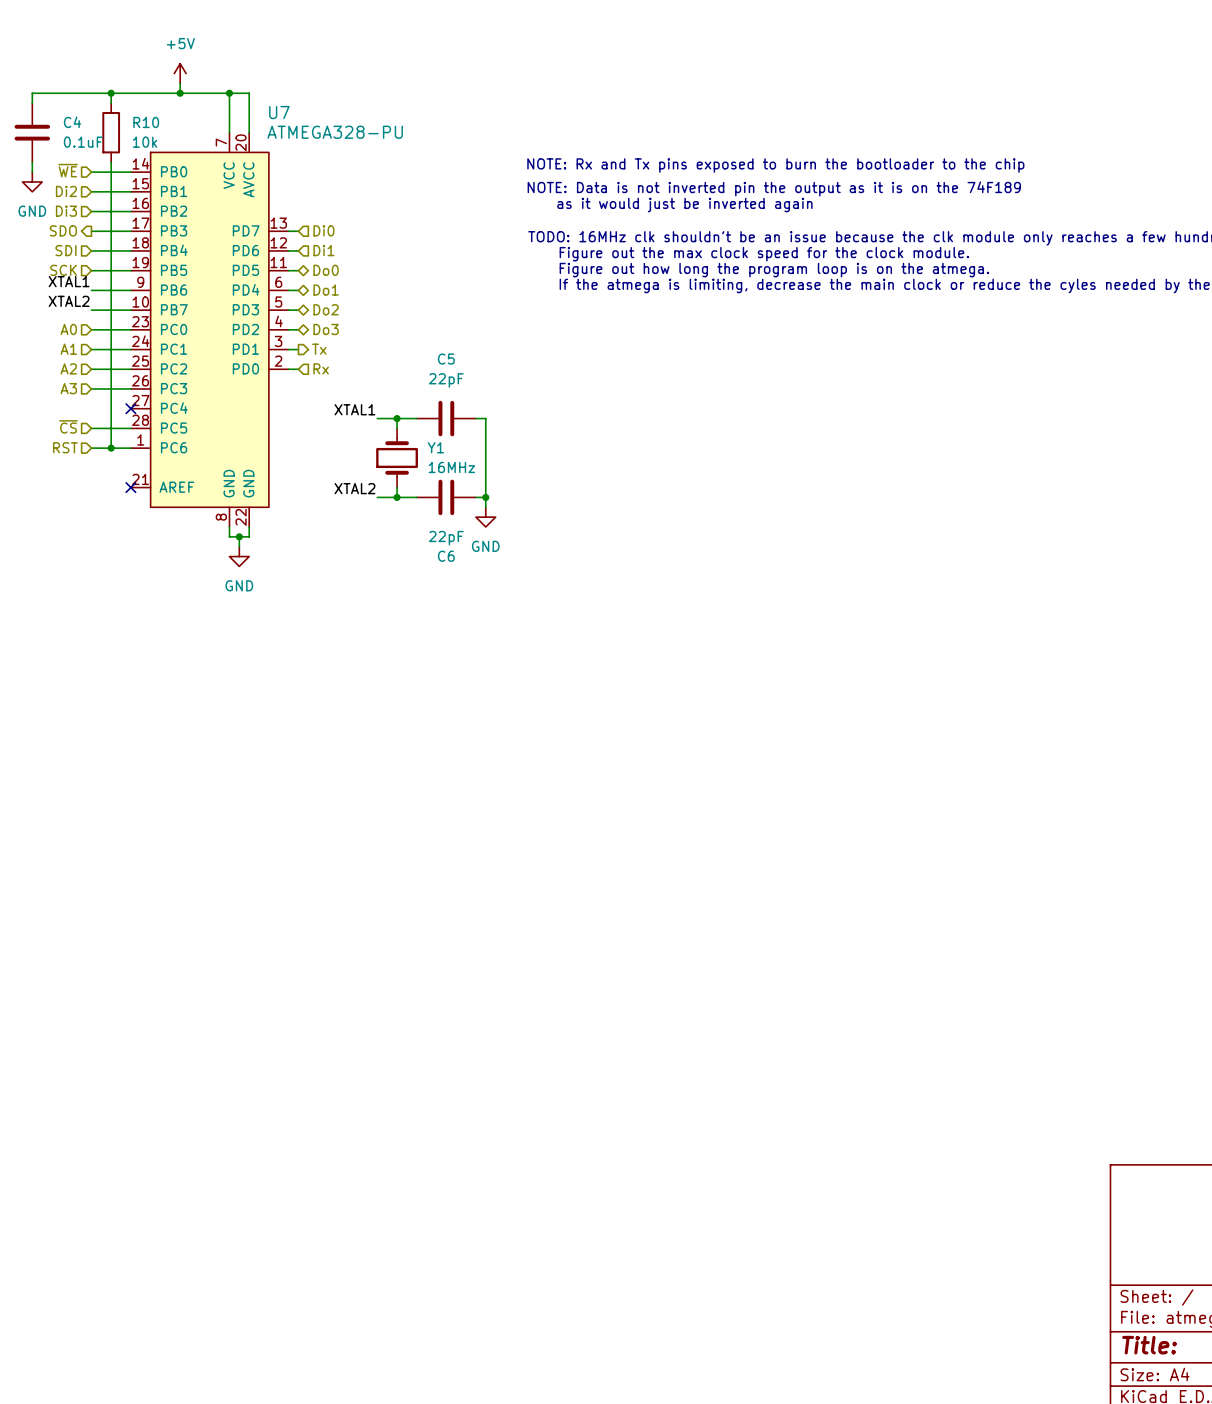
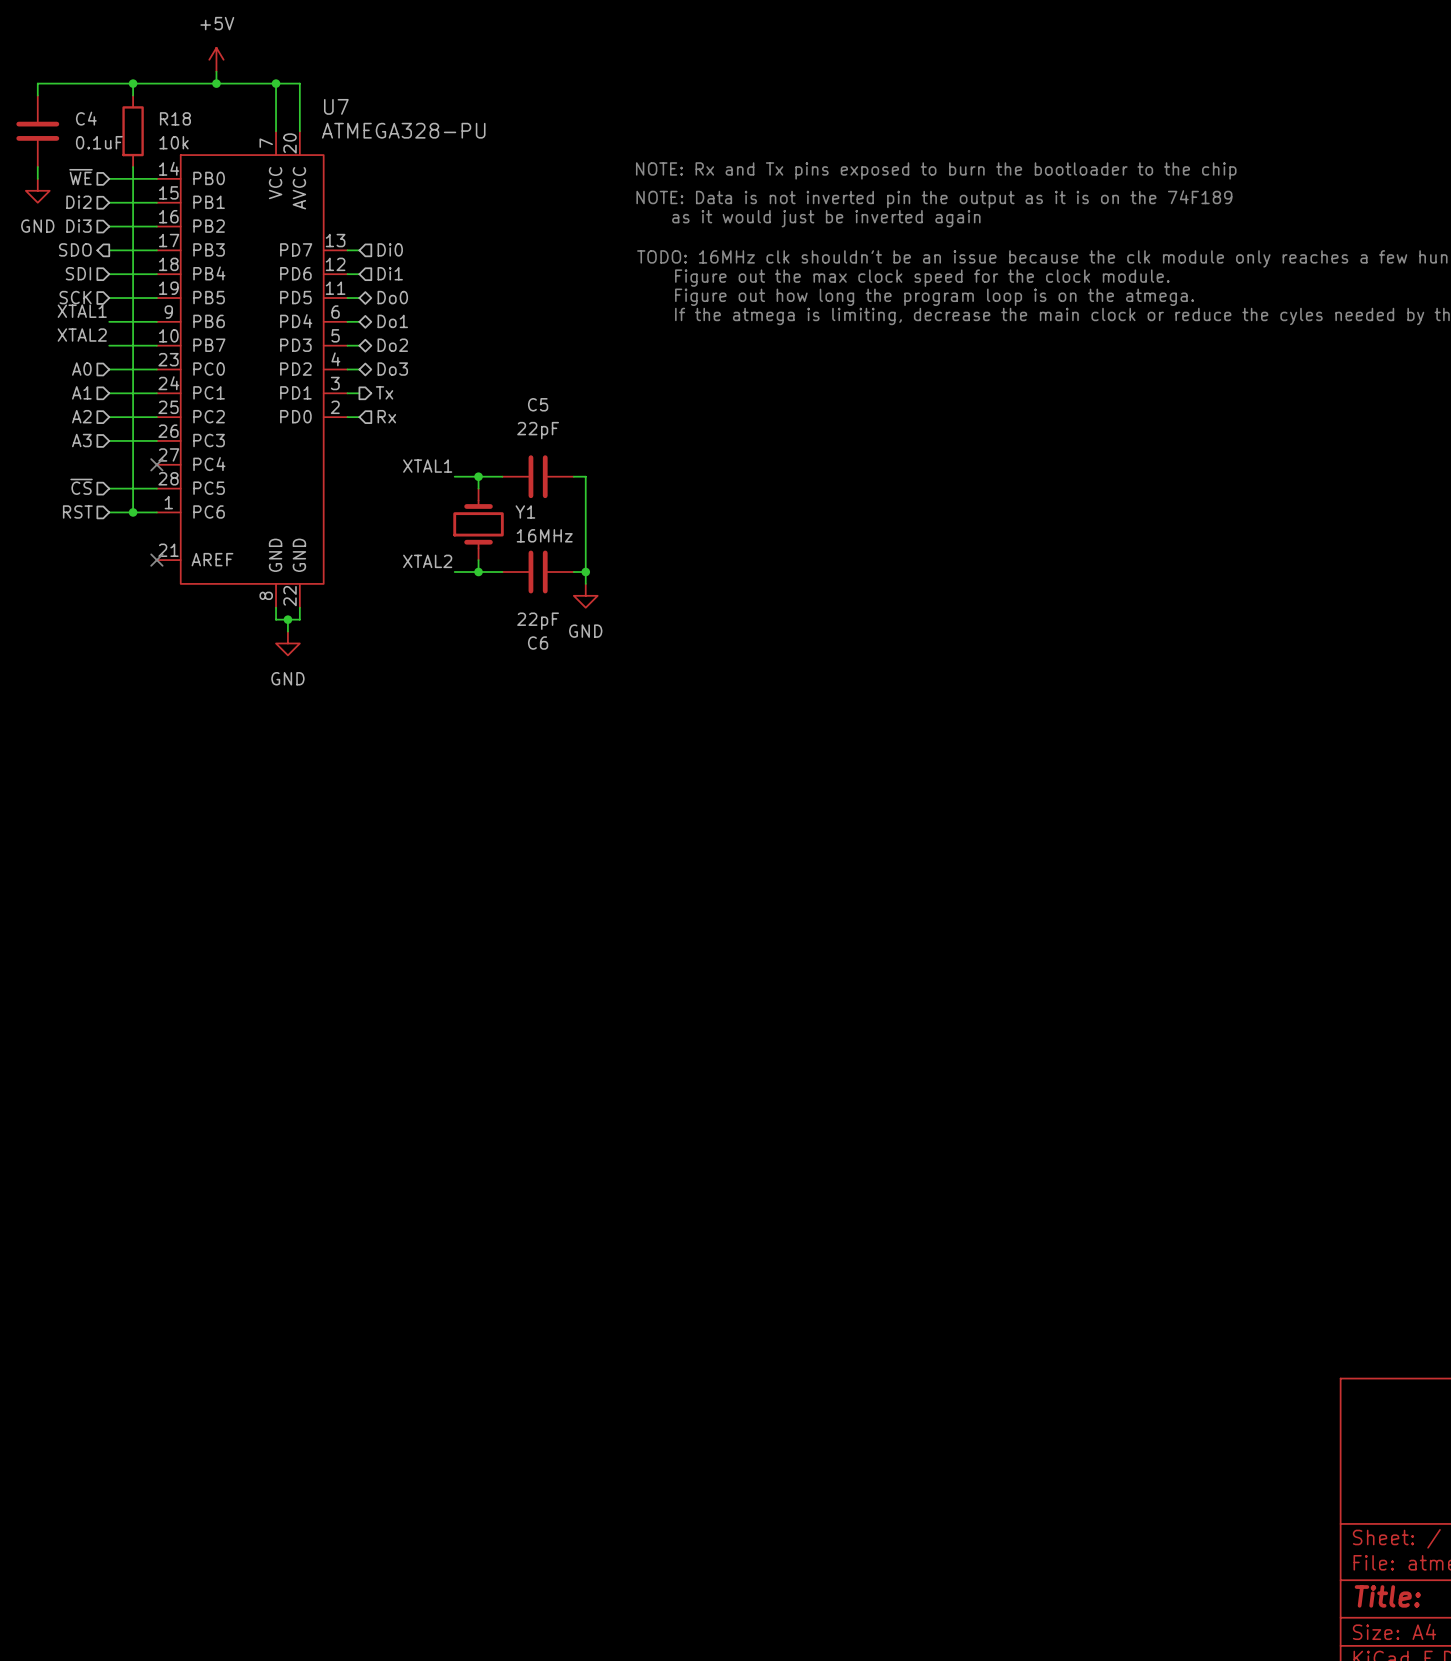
R10 name: R10 (146, 122) -> R18 (175, 118)

